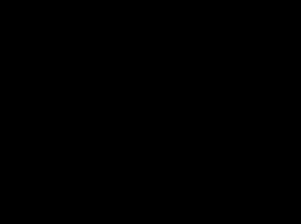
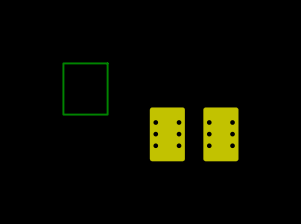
part: none -> (85, 89)
part: none -> (194, 134)

